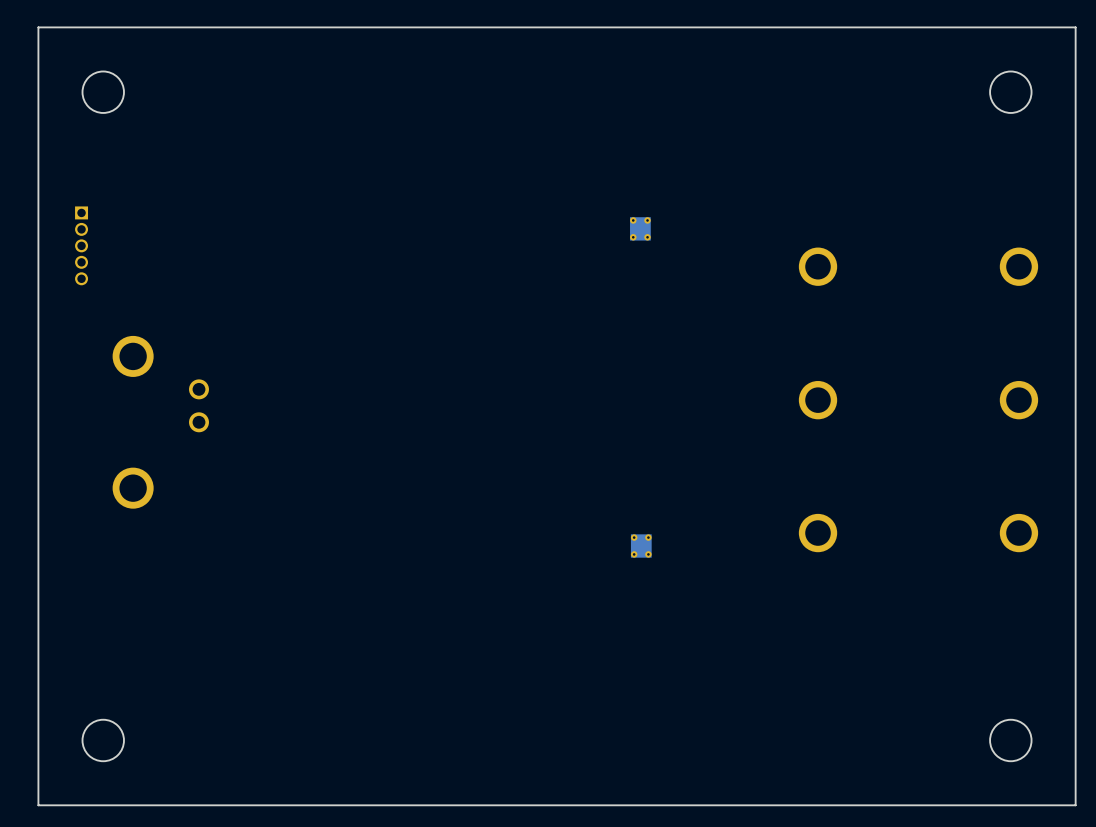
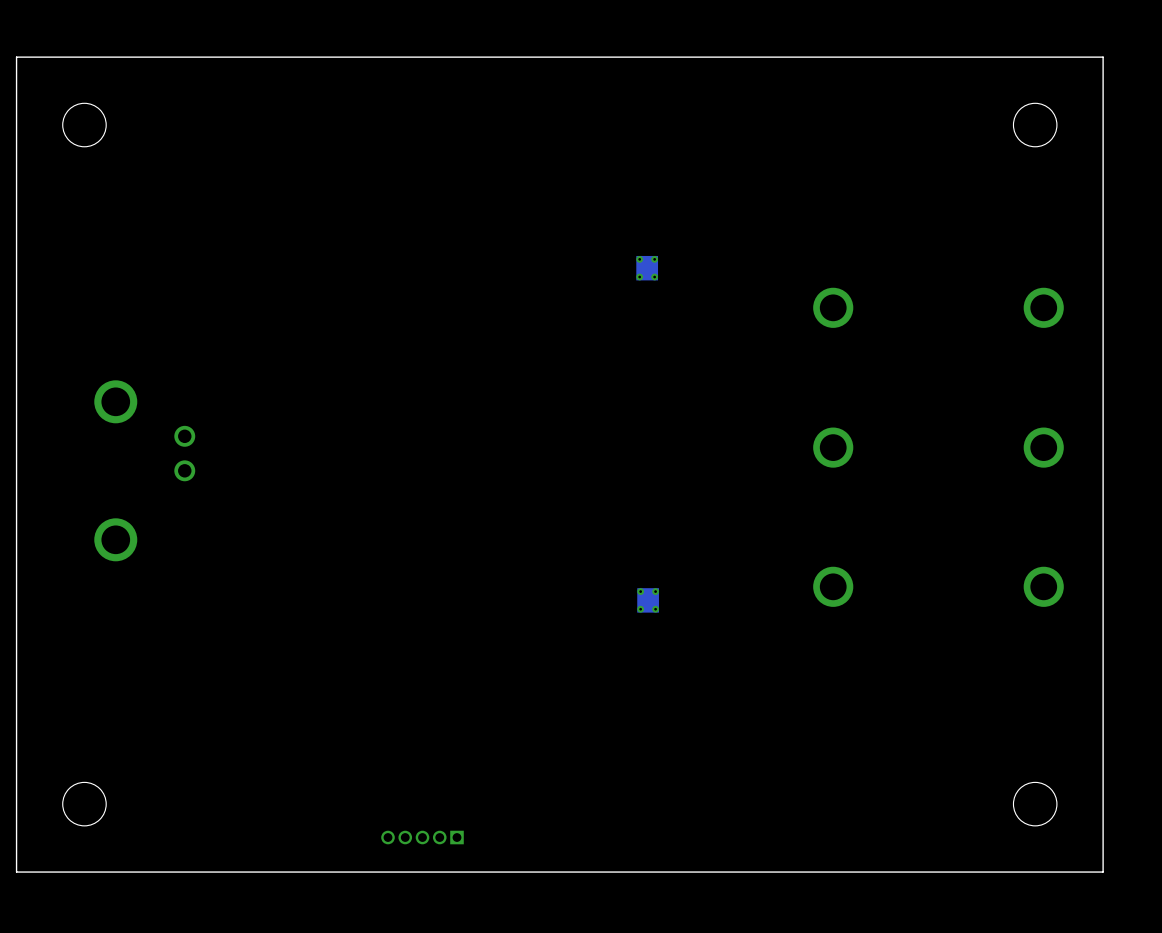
part: (81, 245) -> none
part: none -> (422, 837)

